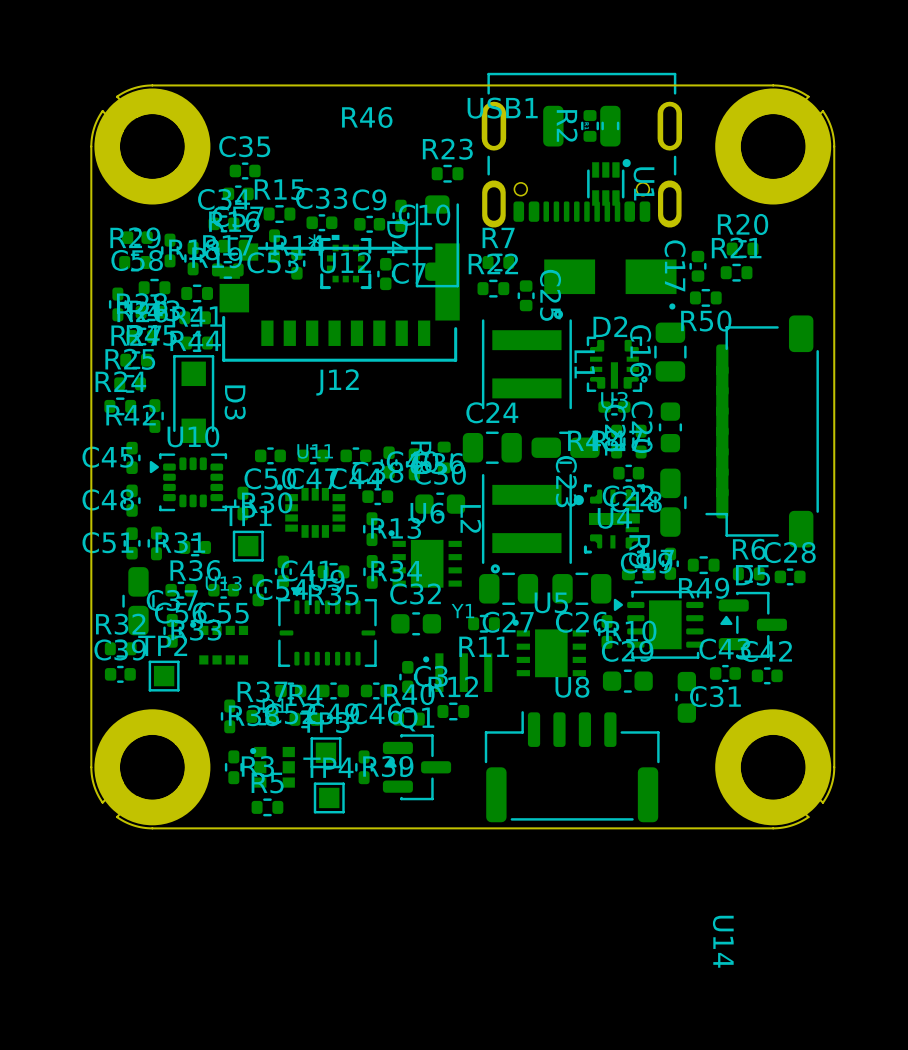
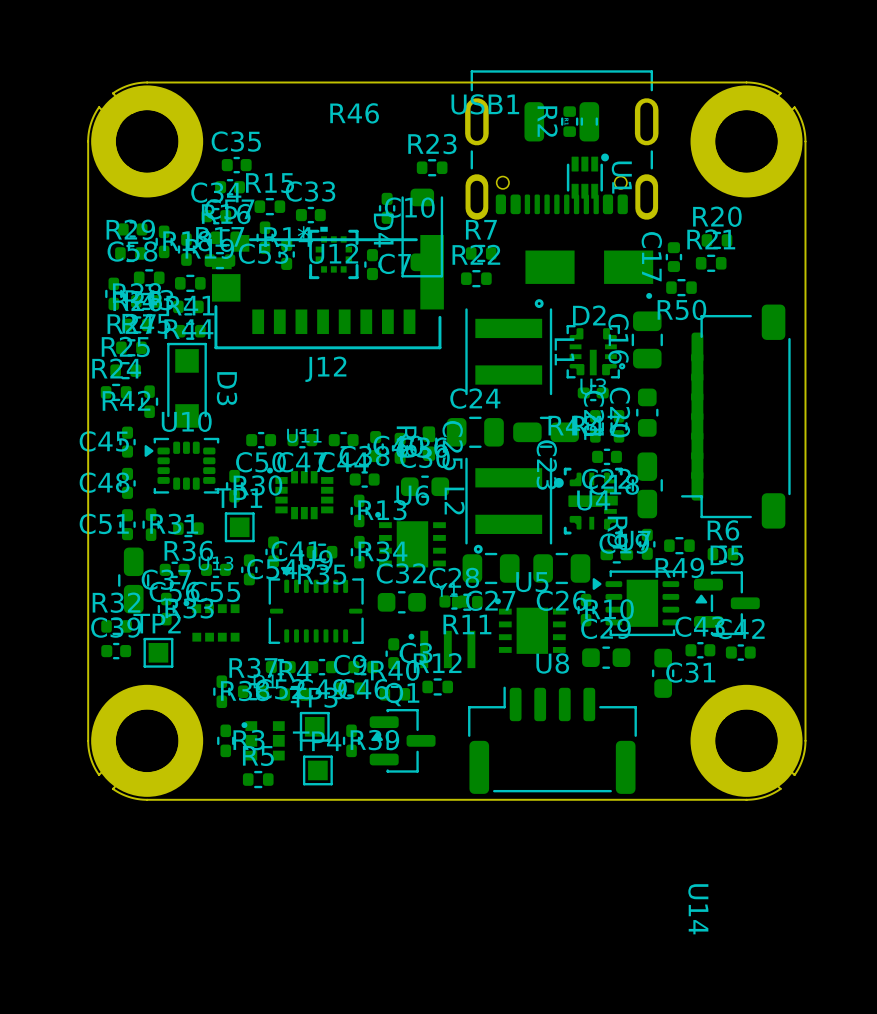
C9 position: (369, 224) -> (350, 688)
C25 position: (526, 295) -> (429, 446)
C28 position: (790, 576) -> (454, 601)

